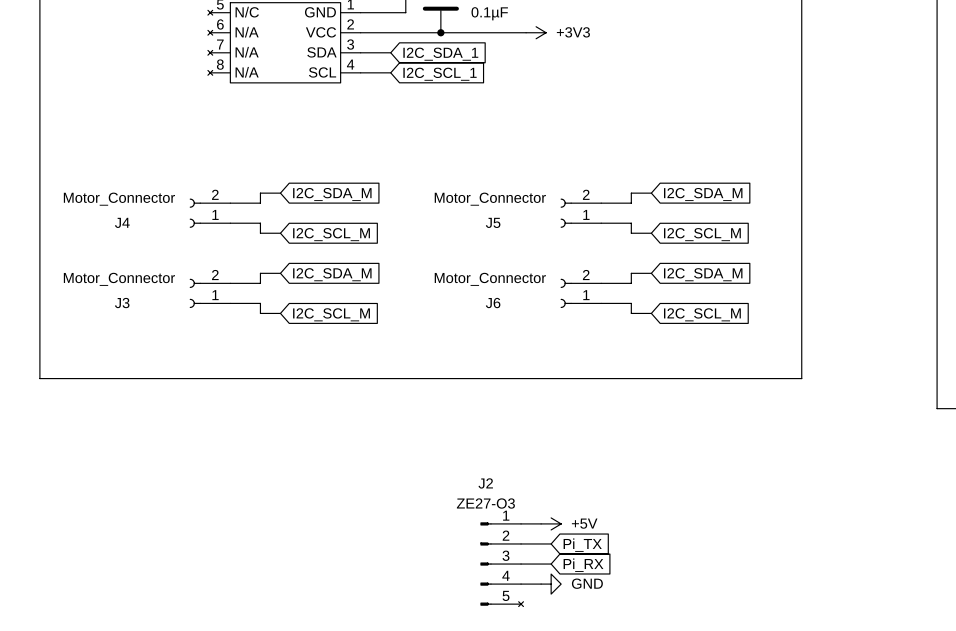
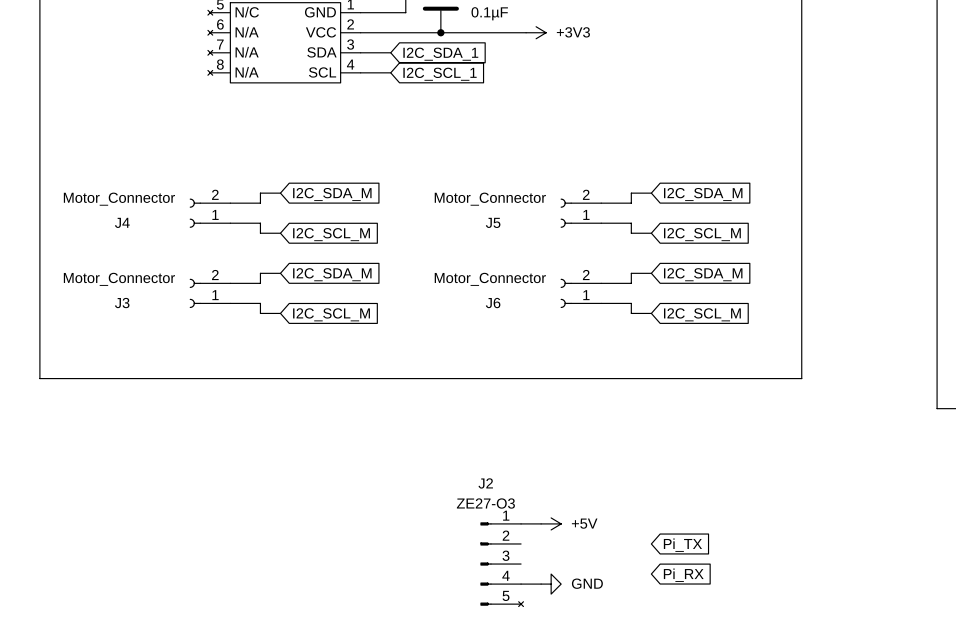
wire: (521, 543) (551, 543) -> none
global label position: Pi_TX (582, 545) -> Pi_TX (682, 545)
wire: (521, 564) (551, 564) -> none
global label position: Pi_RX (583, 565) -> Pi_RX (683, 575)

